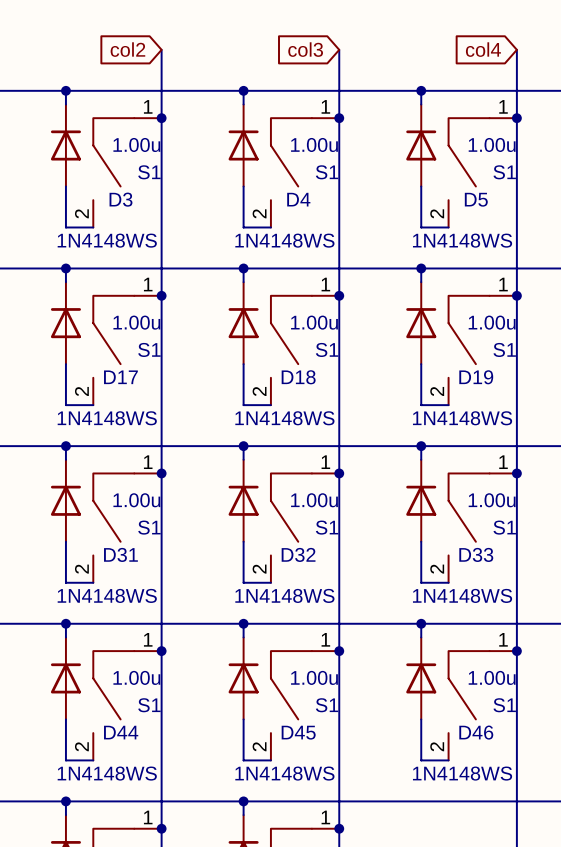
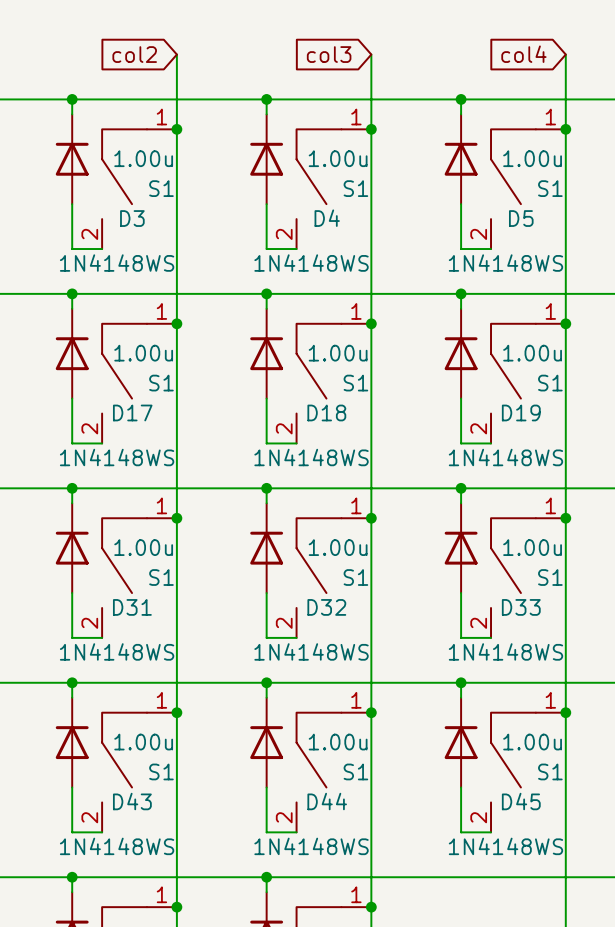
D44 name: D44 (121, 732) -> D43 (132, 801)
D45 name: D45 (298, 732) -> D44 (327, 801)
D46 name: D46 (476, 732) -> D45 (521, 801)

